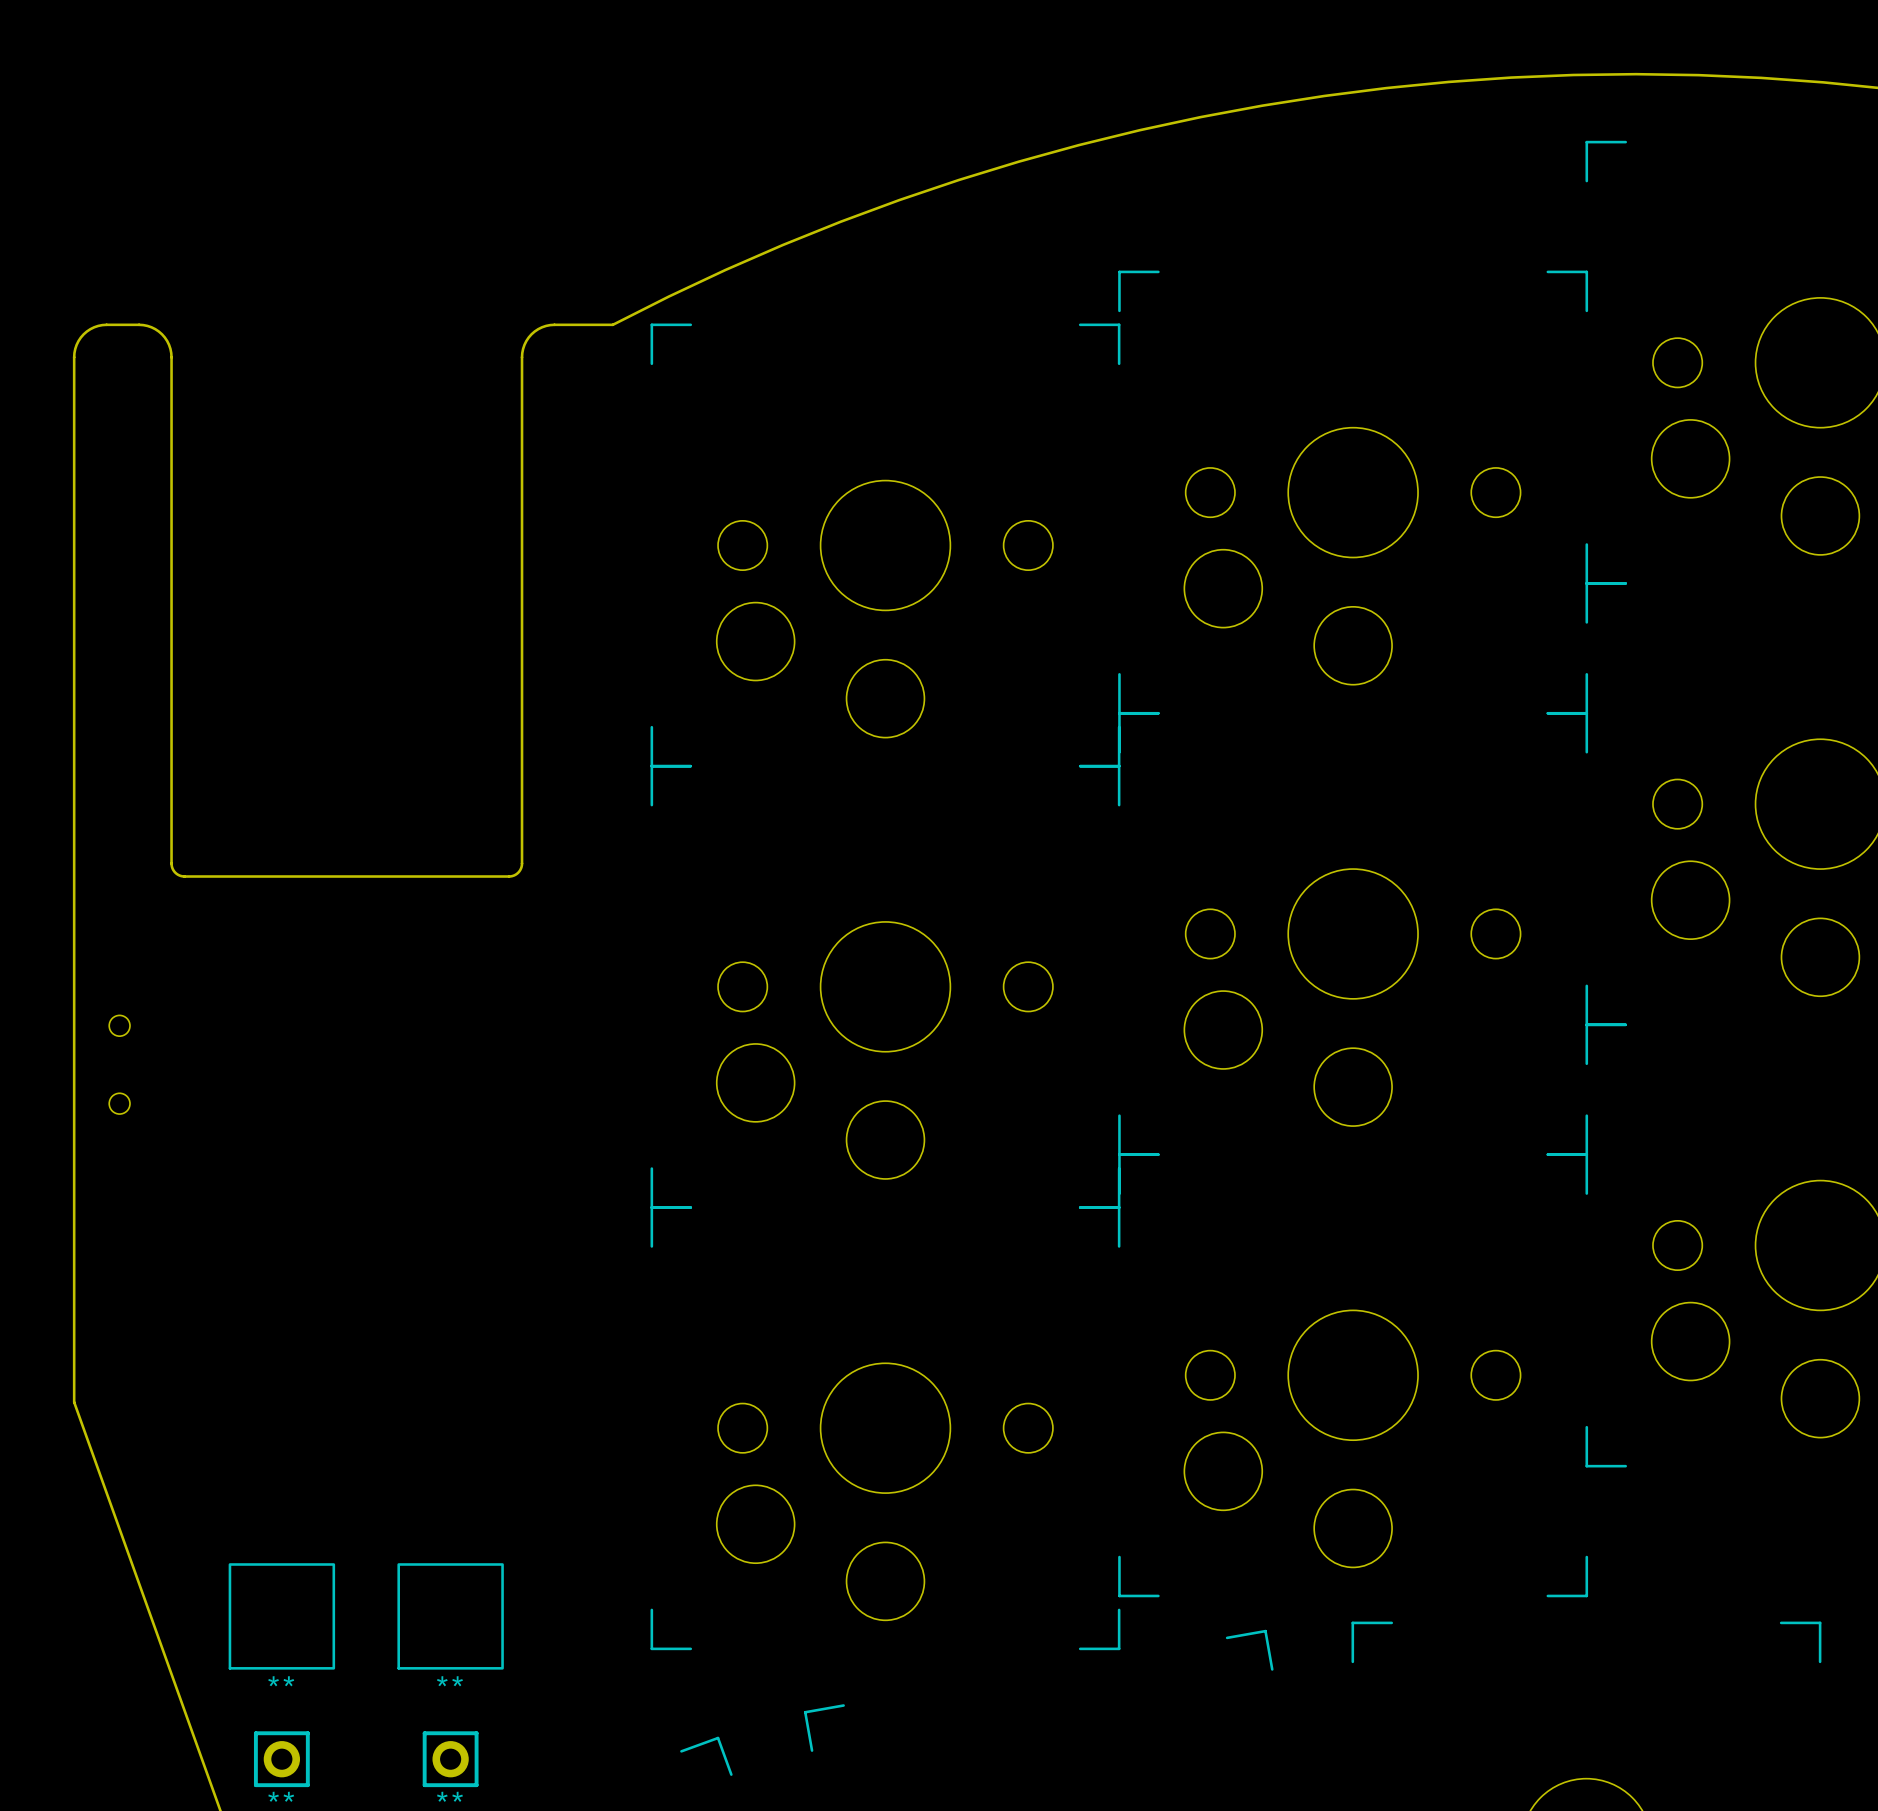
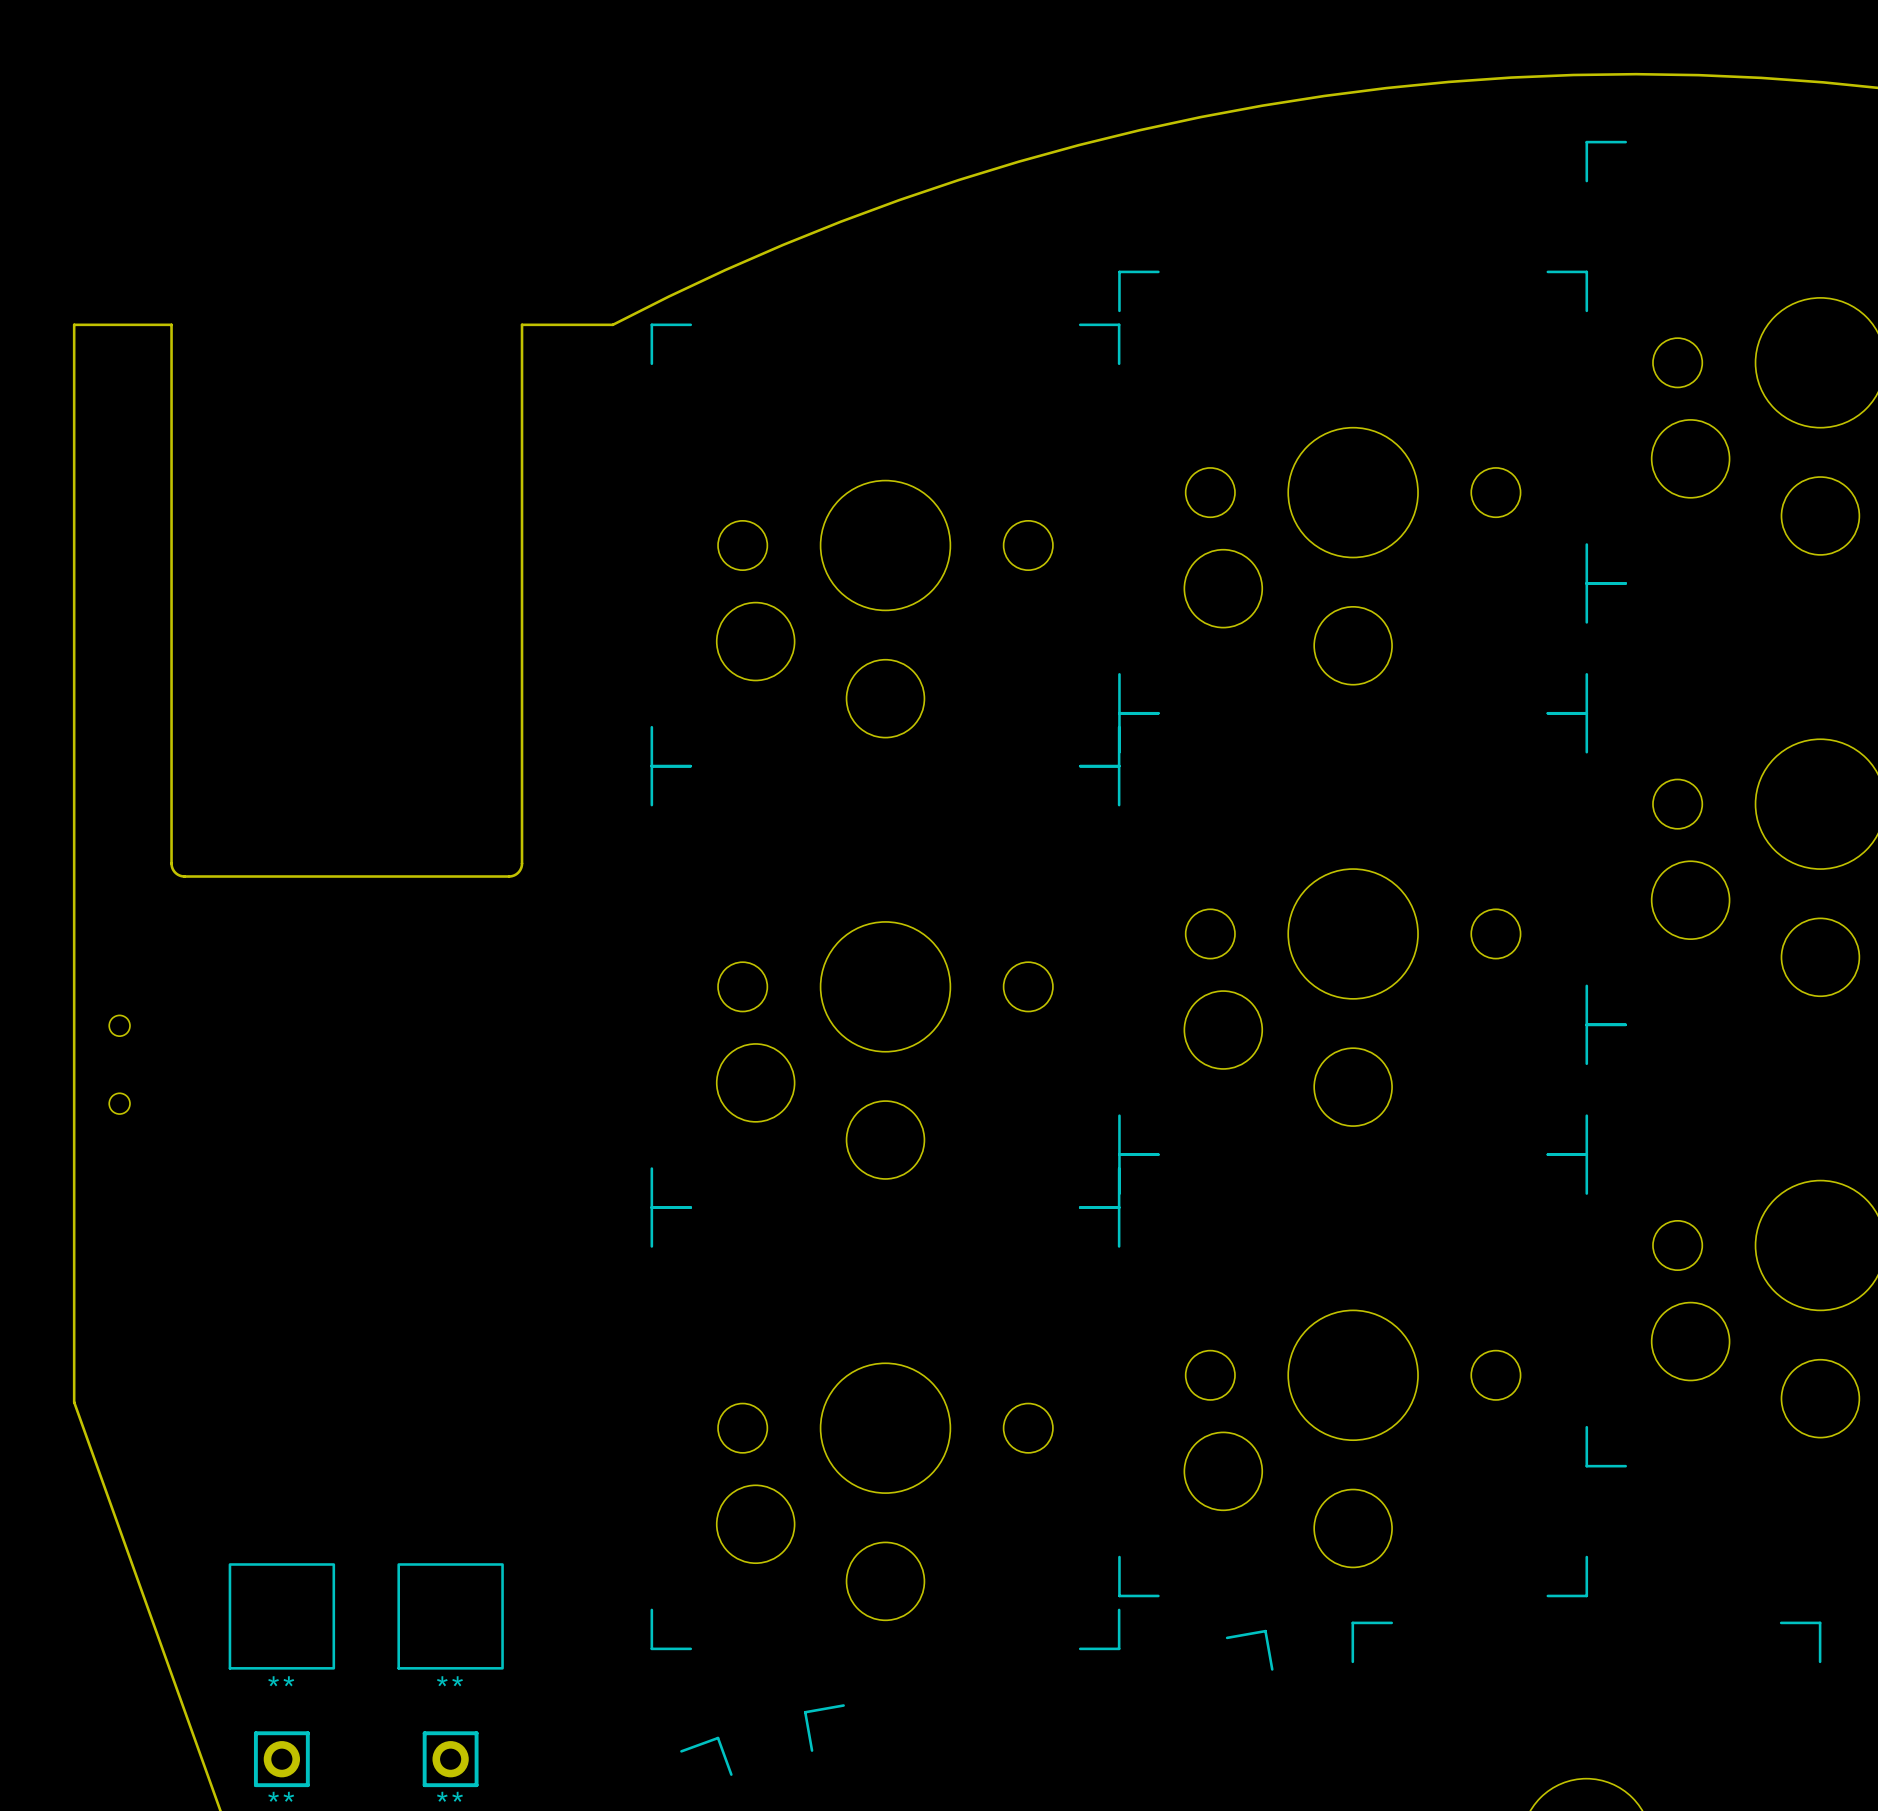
board edge: (106, 324) (94, 327) (83, 334) (76, 344) (74, 357) -> (106, 324) (74, 324) (74, 357)
board edge: (139, 324) (151, 327) (162, 334) (169, 344) (171, 357) -> (139, 324) (171, 324) (171, 357)
board edge: (554, 324) (542, 327) (531, 334) (524, 344) (522, 357) -> (554, 324) (522, 324) (522, 357)

